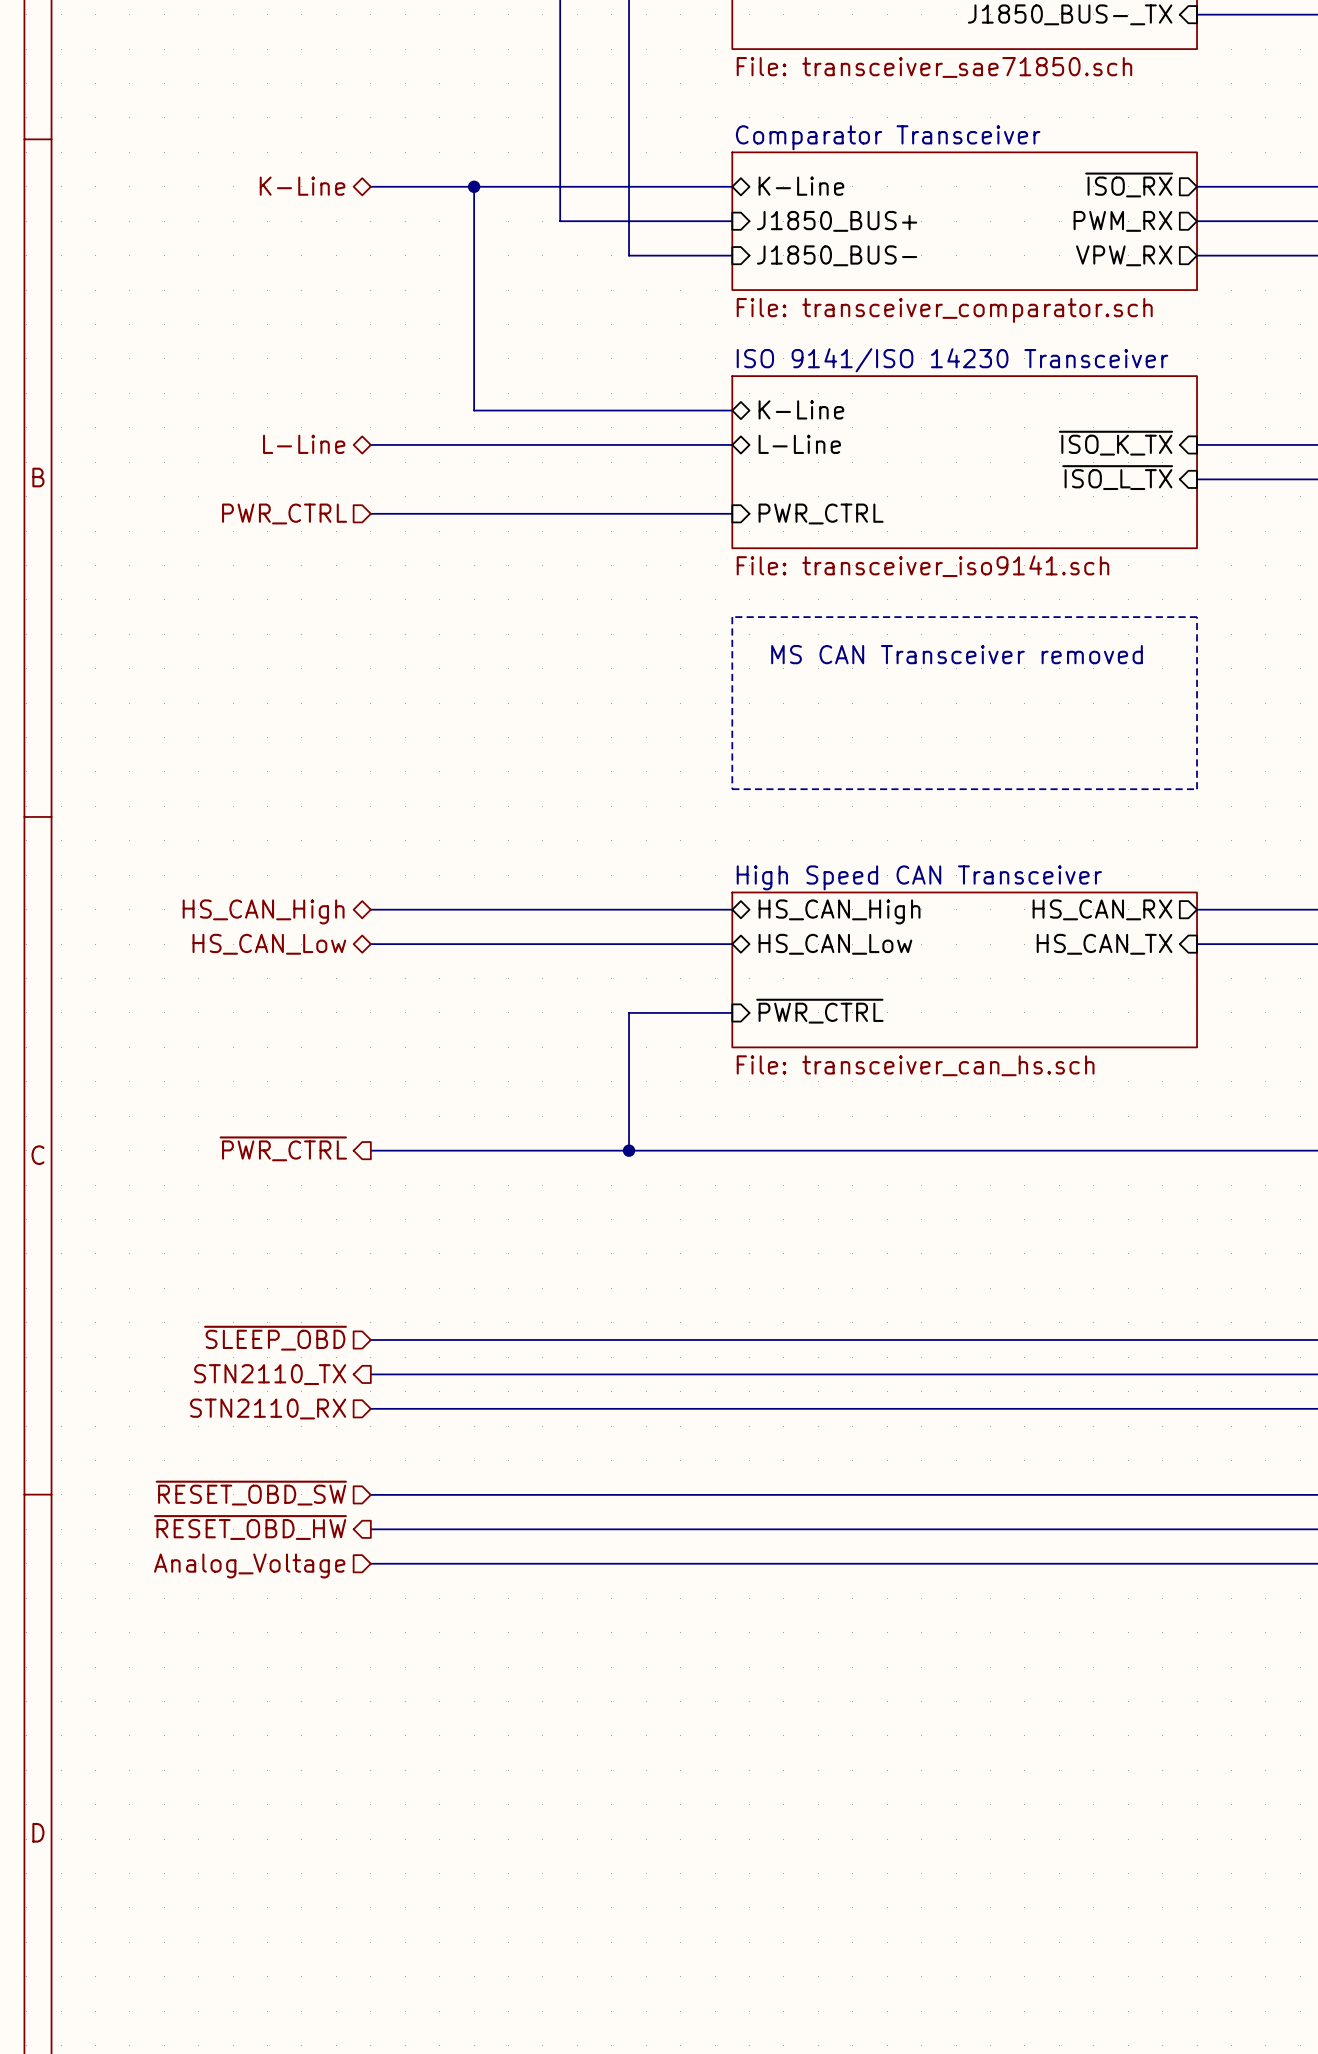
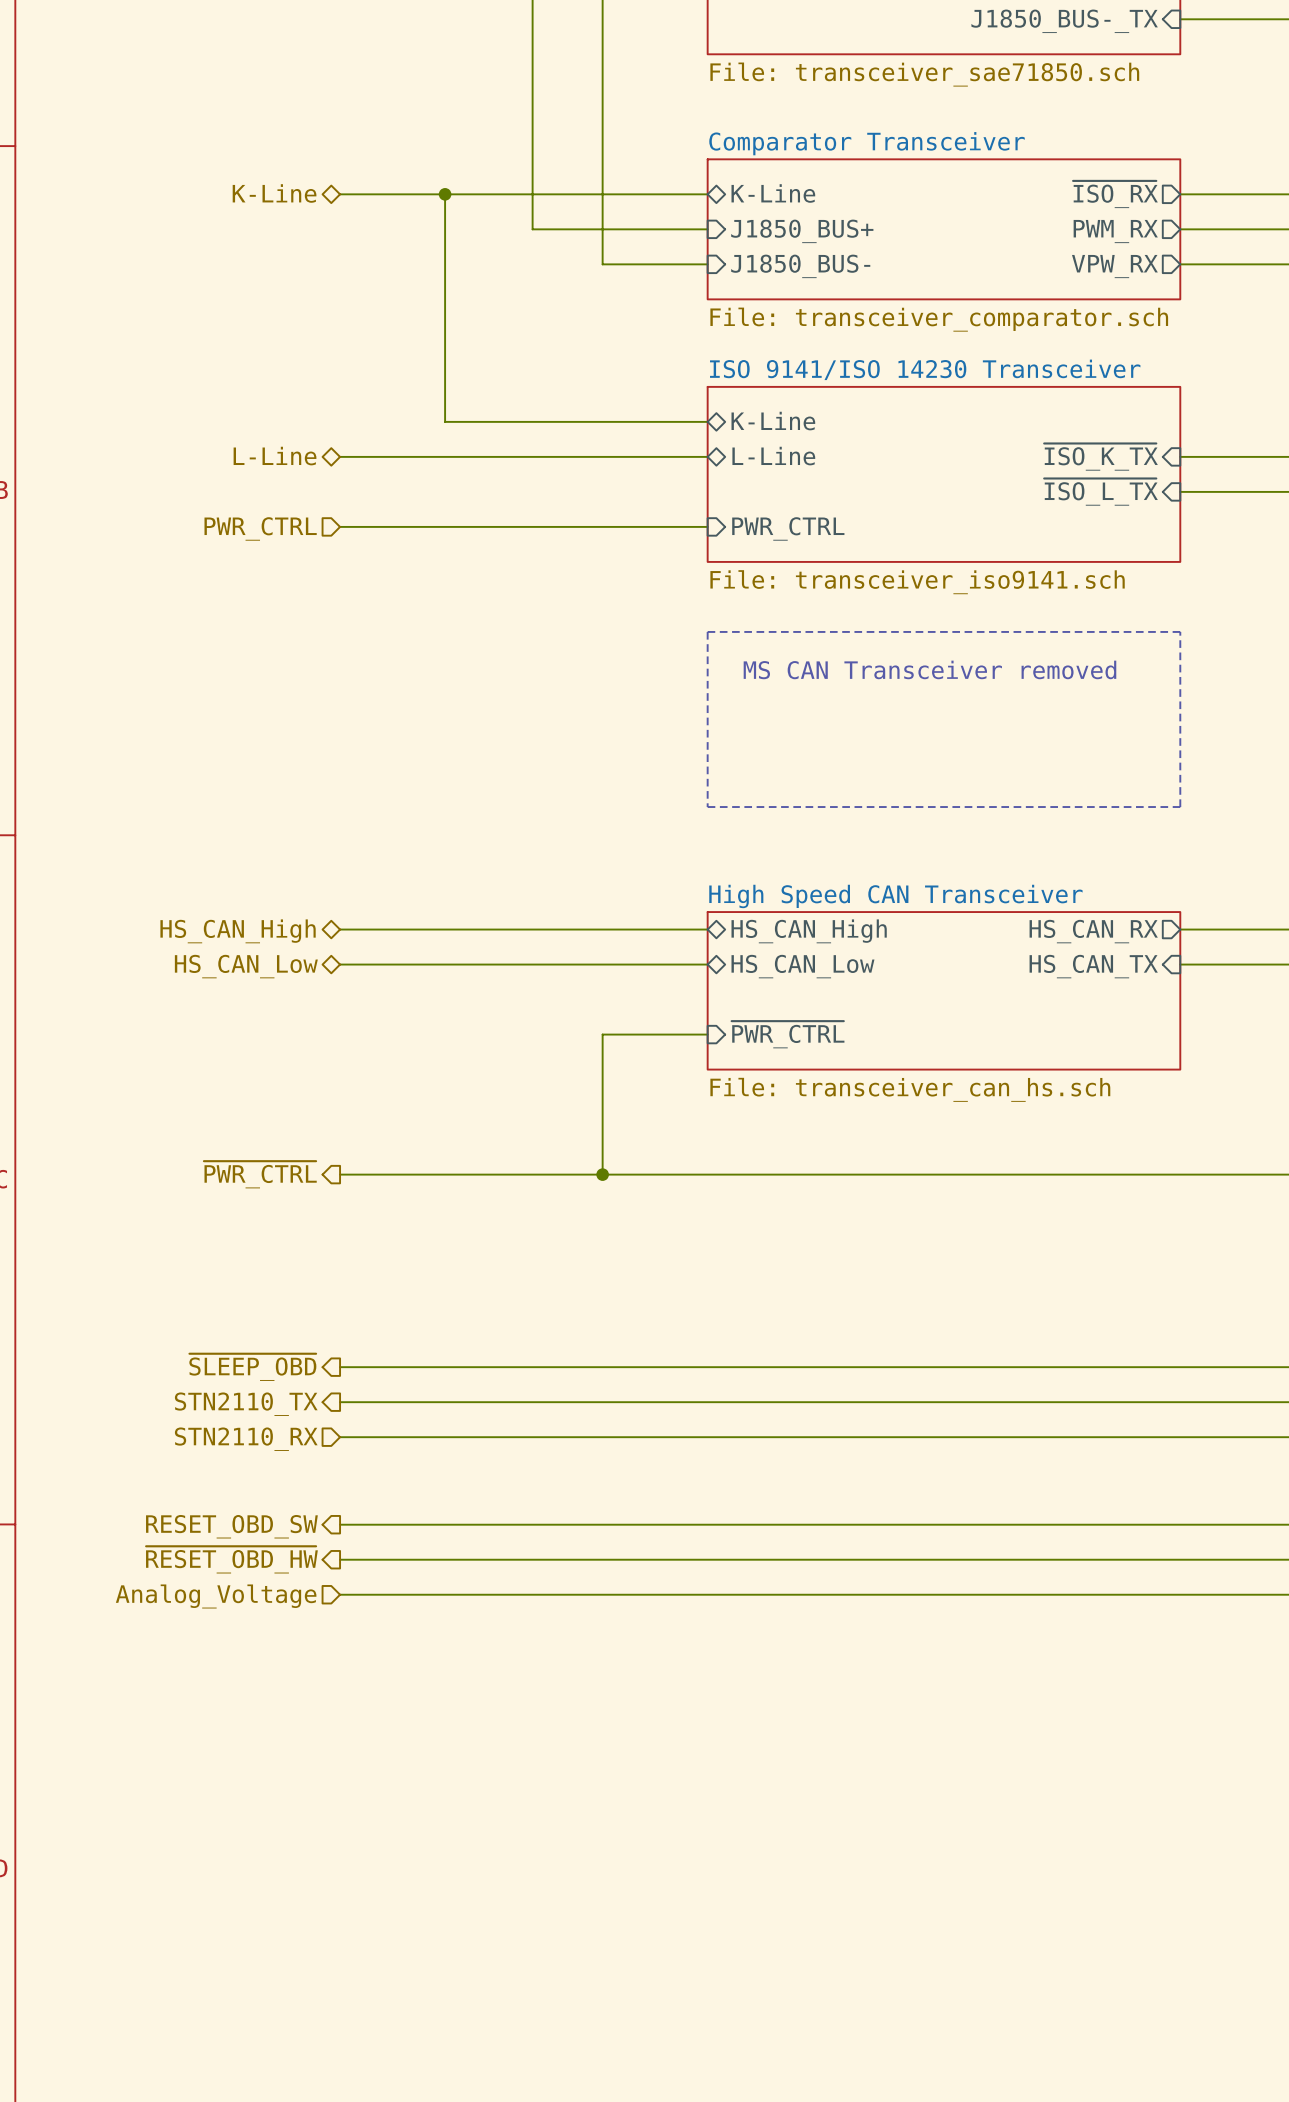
hierarchical label shape: input (275, 1338) -> output (252, 1367)
hierarchical label shape: input (251, 1493) -> output (231, 1526)
hierarchical label: ~{RESET_OBD_SW} (251, 1493) -> RESET_OBD_SW (231, 1526)

